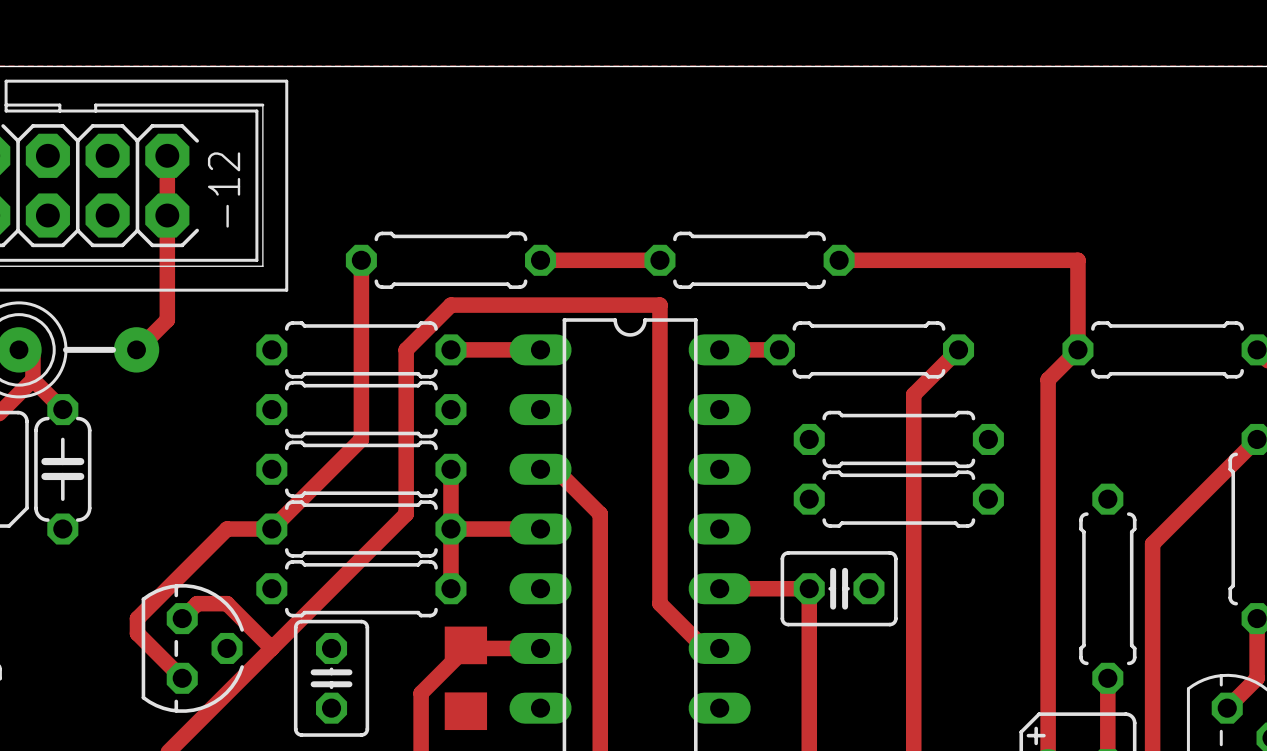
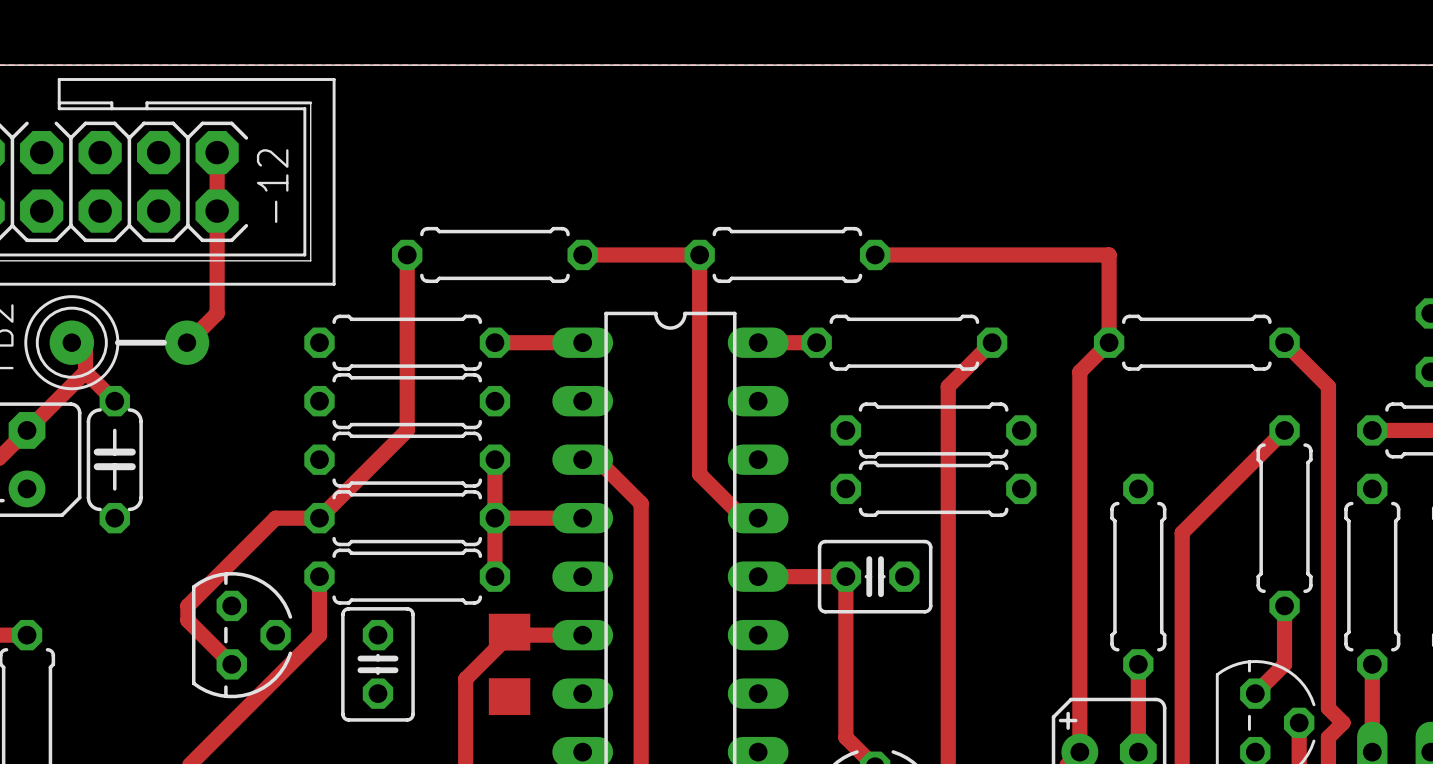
track: (659, 305) (450, 305) (406, 349) (406, 514) (271, 648) (227, 603) (197, 603) (182, 618) -> (699, 298) (699, 254)
track: (659, 484) (659, 603) (704, 648) (719, 648) -> (699, 474) (743, 518) (758, 518)
track: none -> (319, 576) (319, 635)

